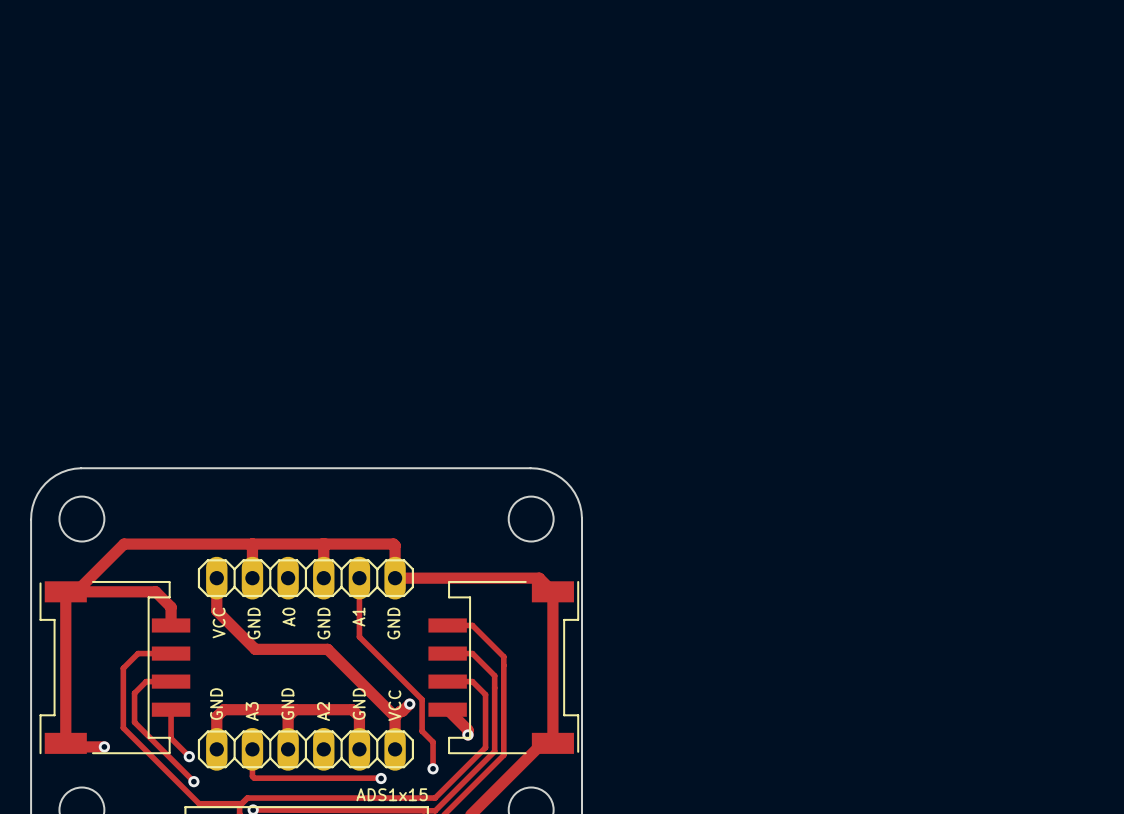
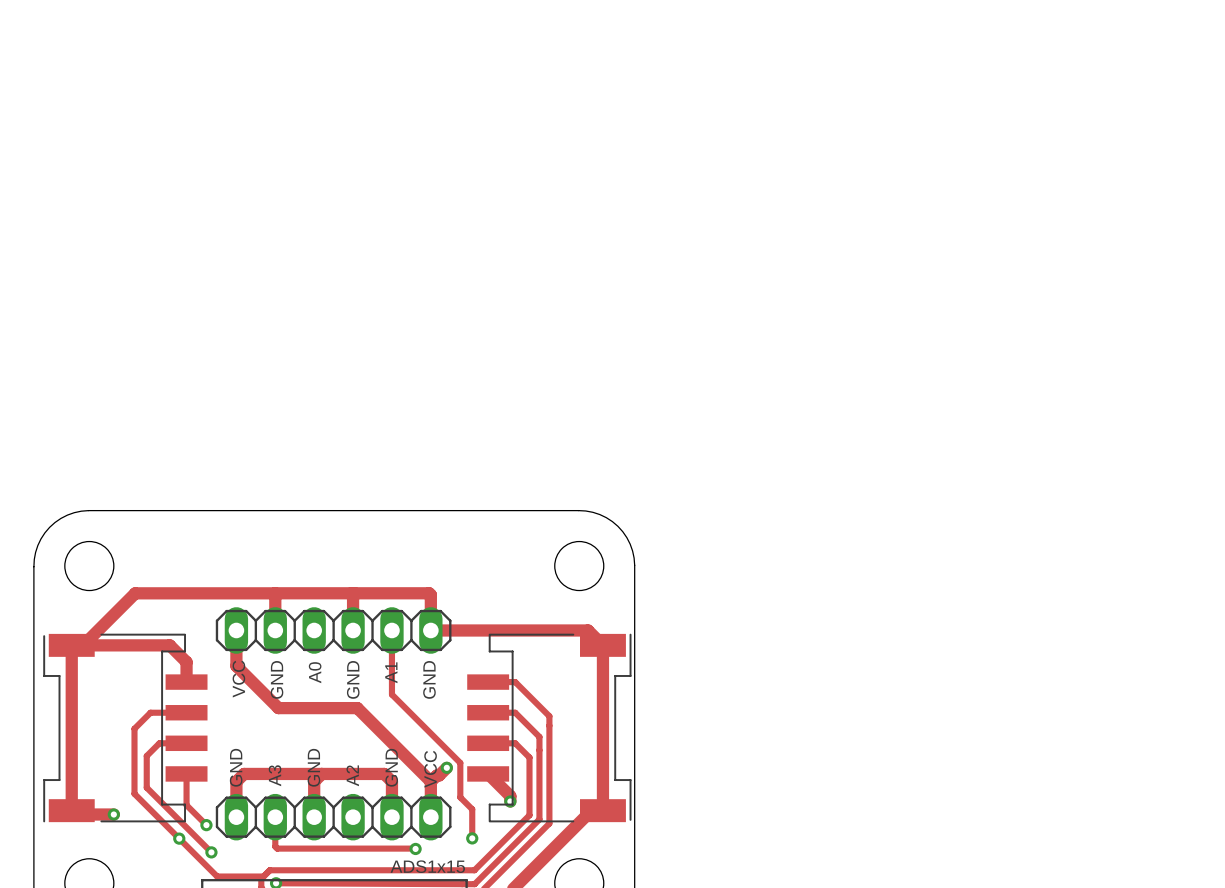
via: none -> (179, 838)

